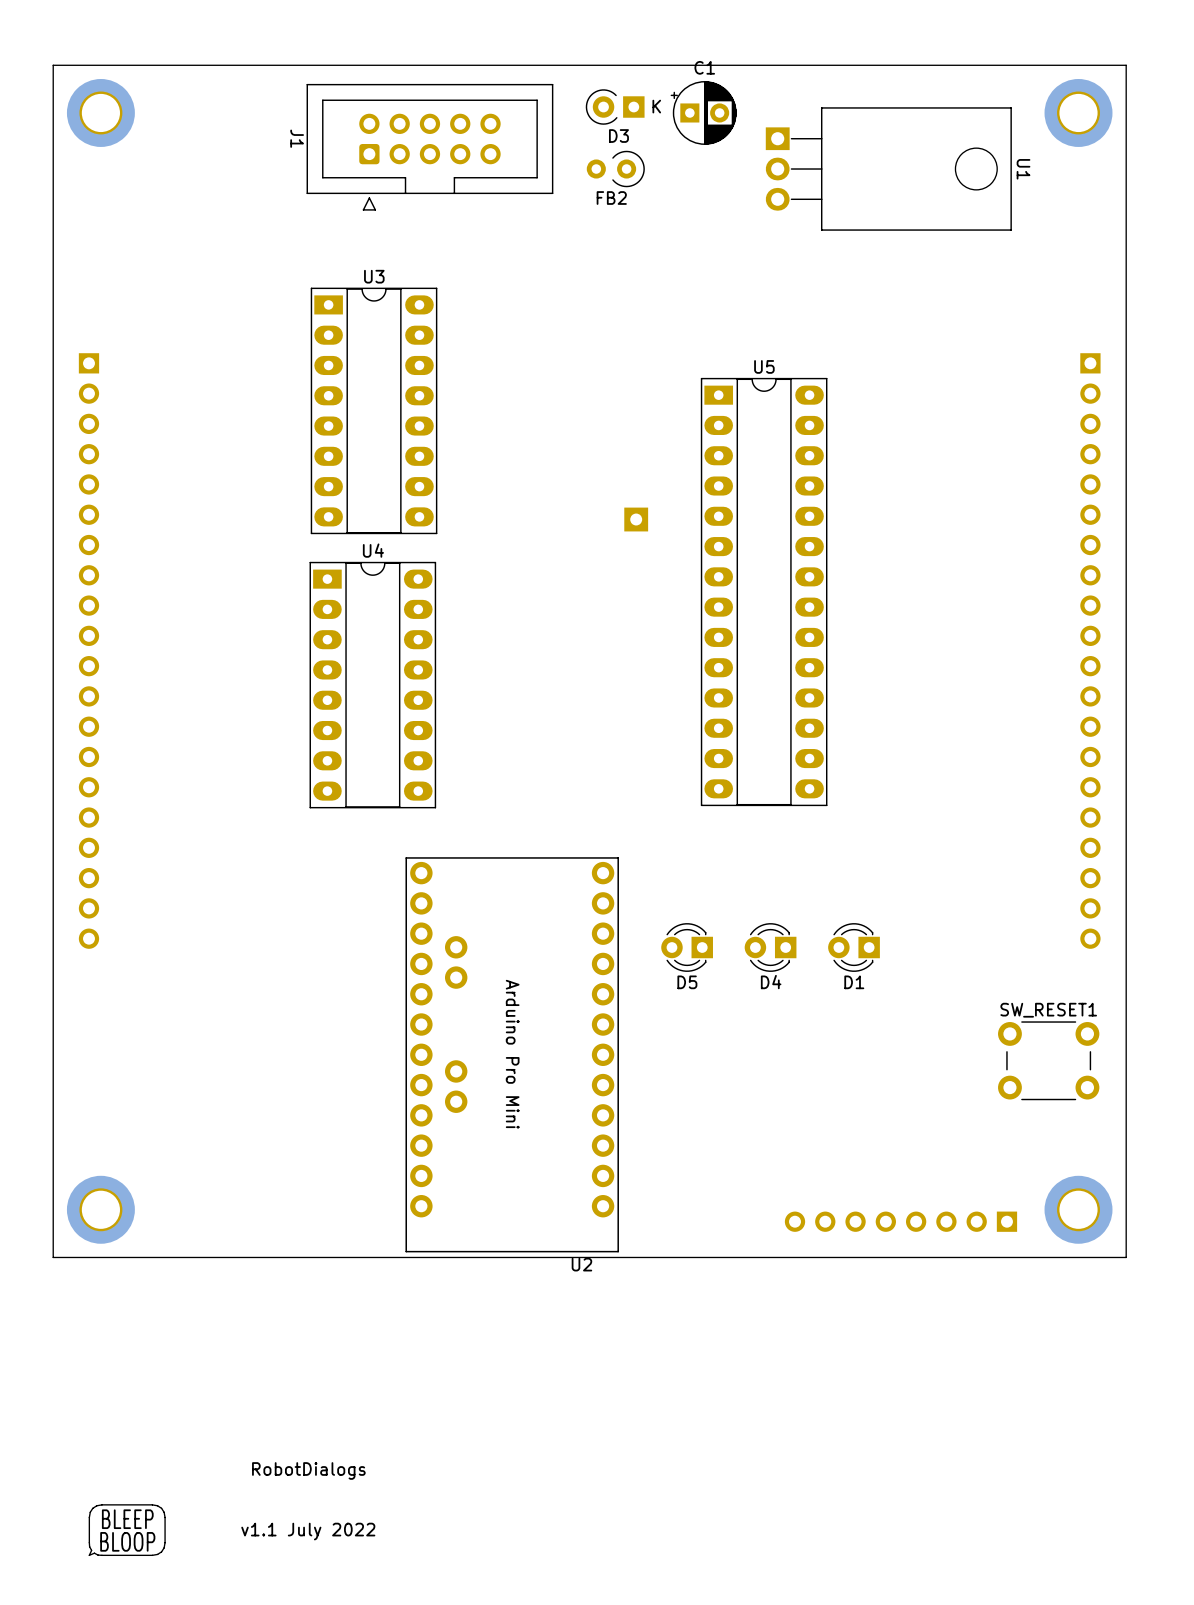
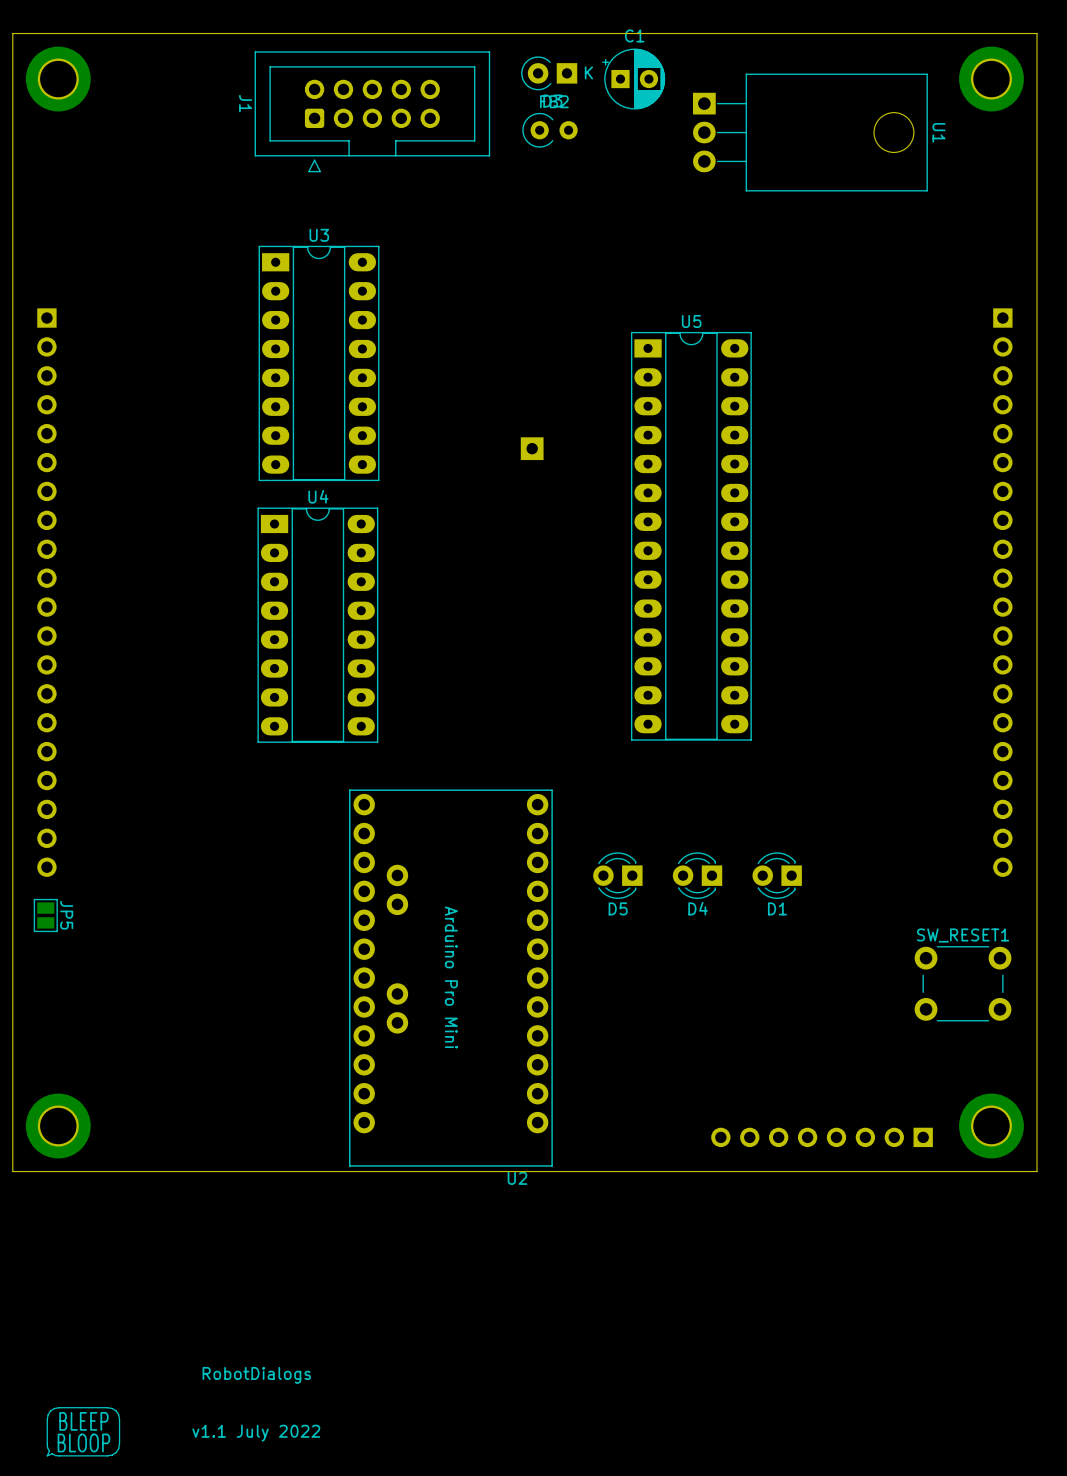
FB2 rotation: 0° (615, 169) -> 180° (549, 130)
part position: (636, 519) -> (532, 448)
JP5: none -> (45, 915)

